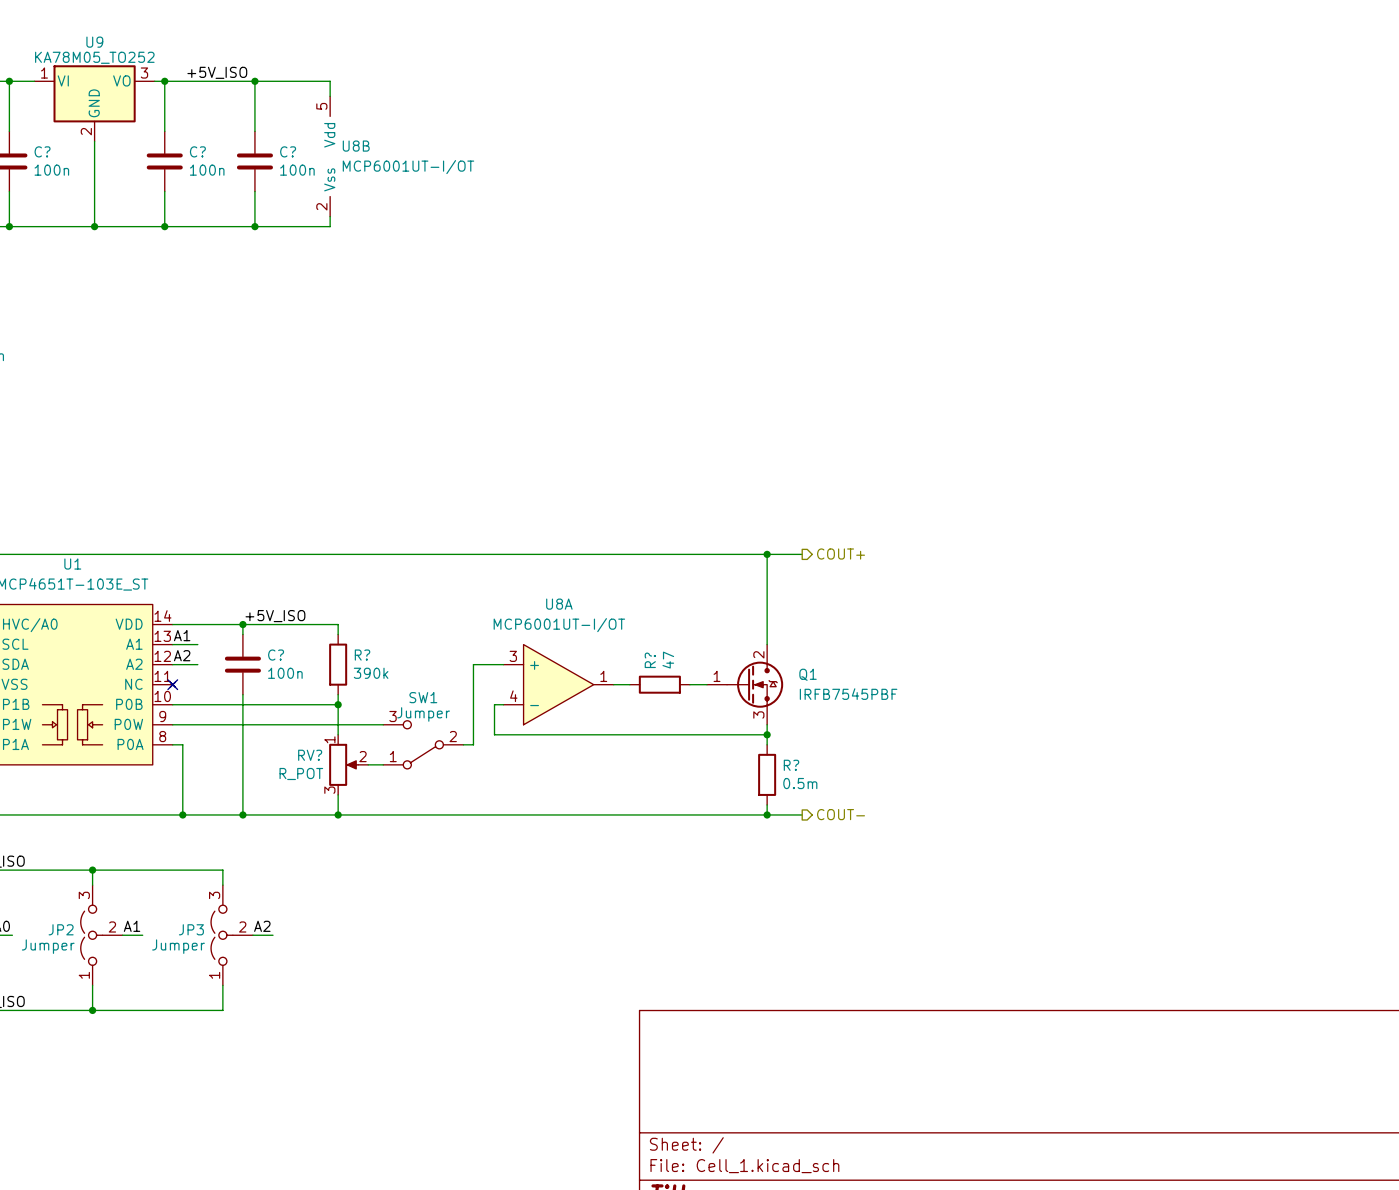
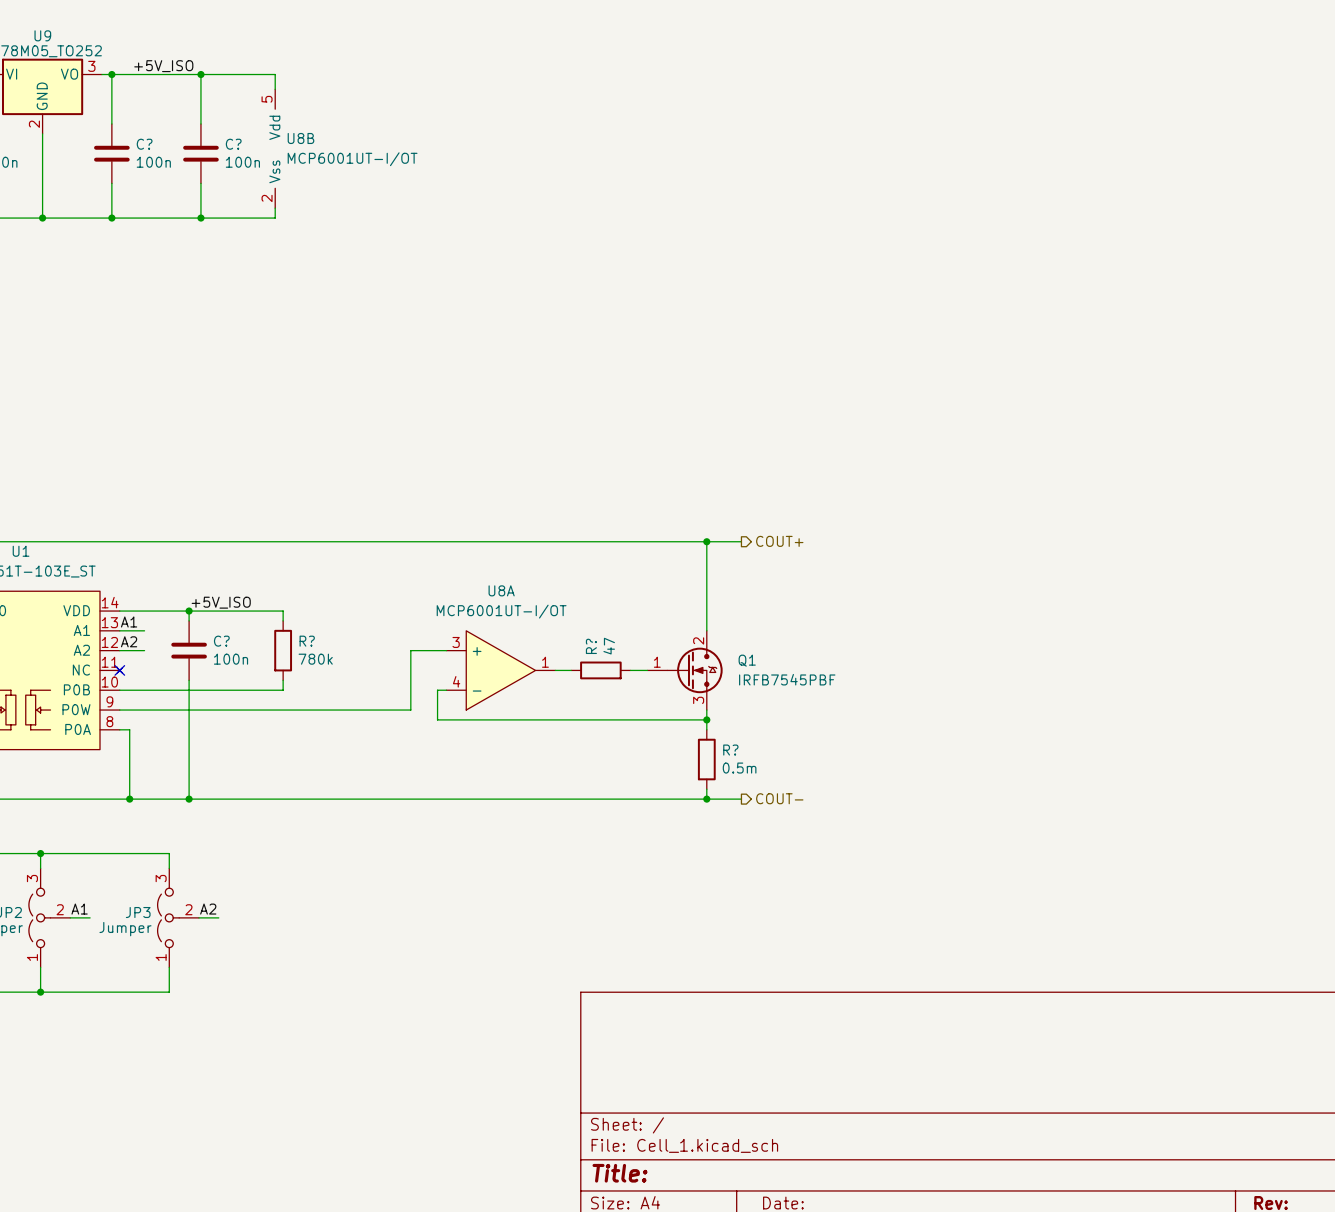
wire: (473, 664) (473, 744) (463, 744) -> (416, 650) (410, 650) (410, 710) (327, 710)
R? value: 390k (371, 673) -> 780k (315, 659)
wire: (338, 704) (338, 734) -> none
junction: (338, 704) -> none
SW1: Jumper (423, 744) -> none
RV?: R_POT (348, 764) -> none
wire: (368, 764) (383, 764) -> none
wire: (338, 794) (338, 814) -> none
junction: (338, 814) -> none

